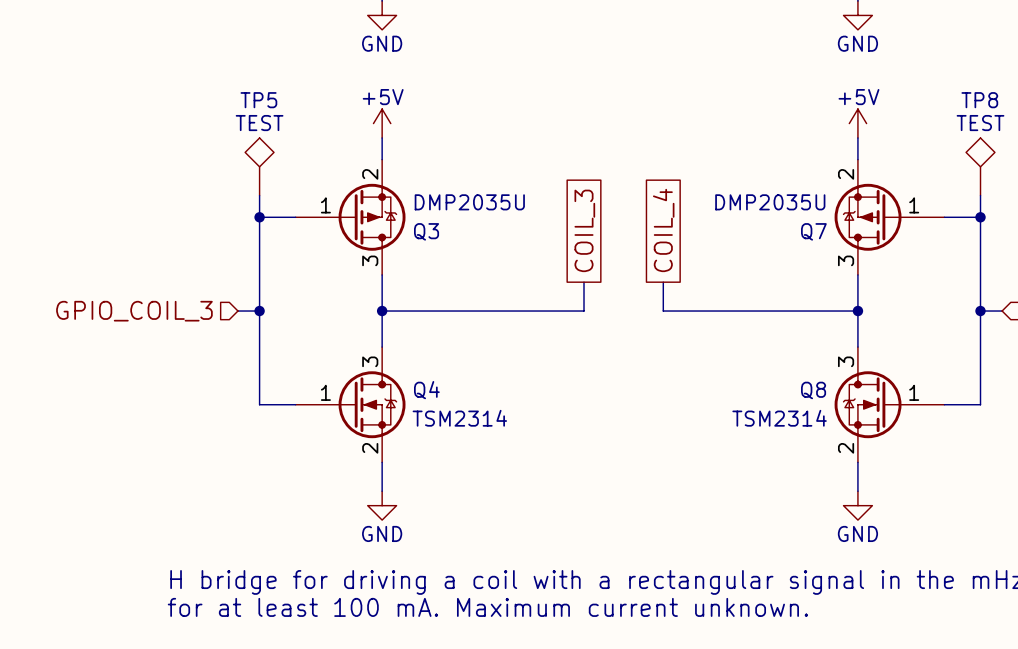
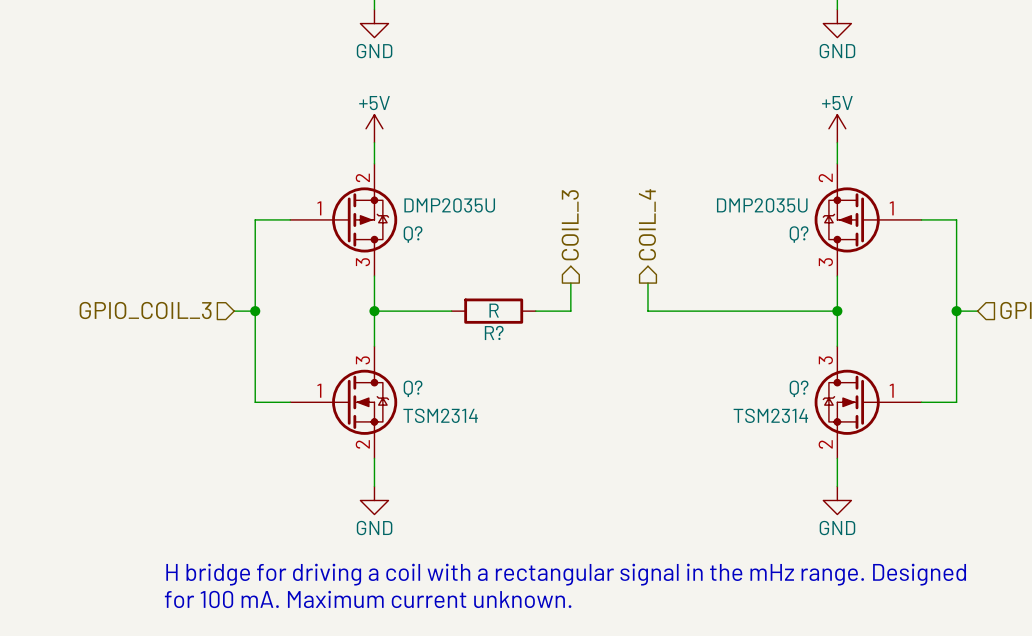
TP5: TEST (259, 166) -> none
TP8: TEST (980, 166) -> none
wire: (259, 195) (259, 217) -> none
wire: (980, 195) (980, 217) -> none
hierarchical label: none -> COIL_3 (570, 225)
hierarchical label: none -> COIL_4 (647, 224)
junction: (259, 217) -> none
junction: (980, 217) -> none
global label: COIL_3 (584, 230) -> none
global label: COIL_4 (663, 230) -> none
Q3 name: Q3 (426, 231) -> Q? (413, 234)
Q7 name: Q7 (813, 231) -> Q? (799, 234)
wire: (461, 311) (547, 311) -> none
R?: none -> R (493, 311)
Q4 name: Q4 (426, 390) -> Q? (413, 388)
Q8 name: Q8 (813, 390) -> Q? (799, 388)
text: for at least 100 mA. Maximum current unknown. (487, 607) -> for 100 mA. Maximum current unknown. (368, 599)

